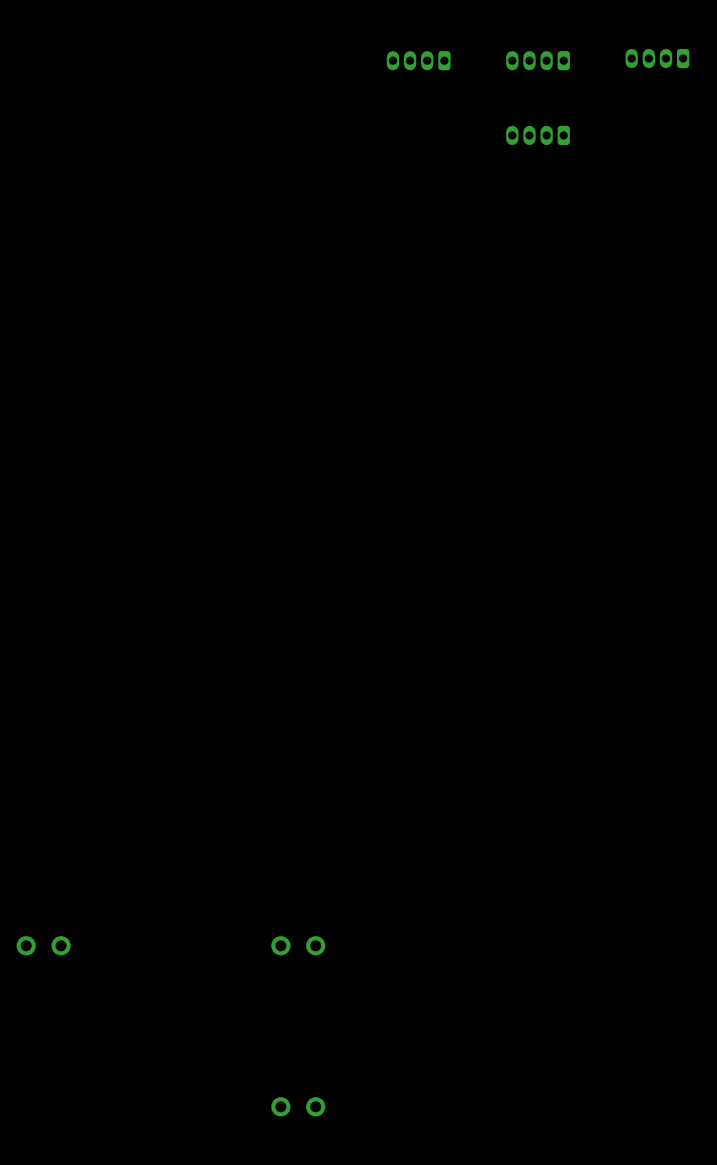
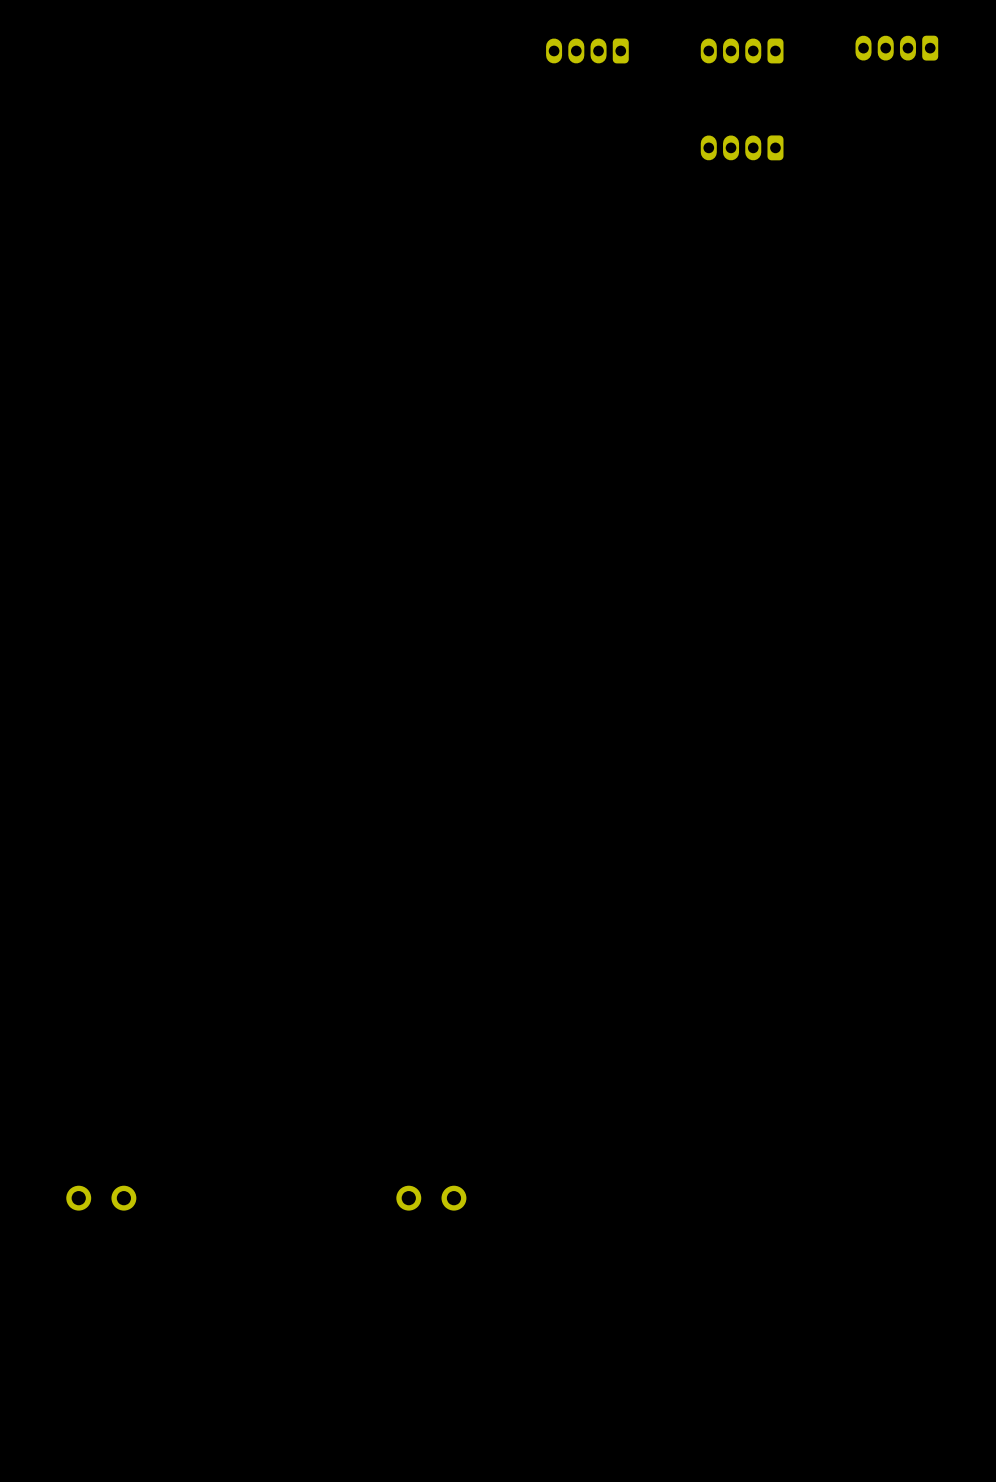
part: (298, 1106) -> none

